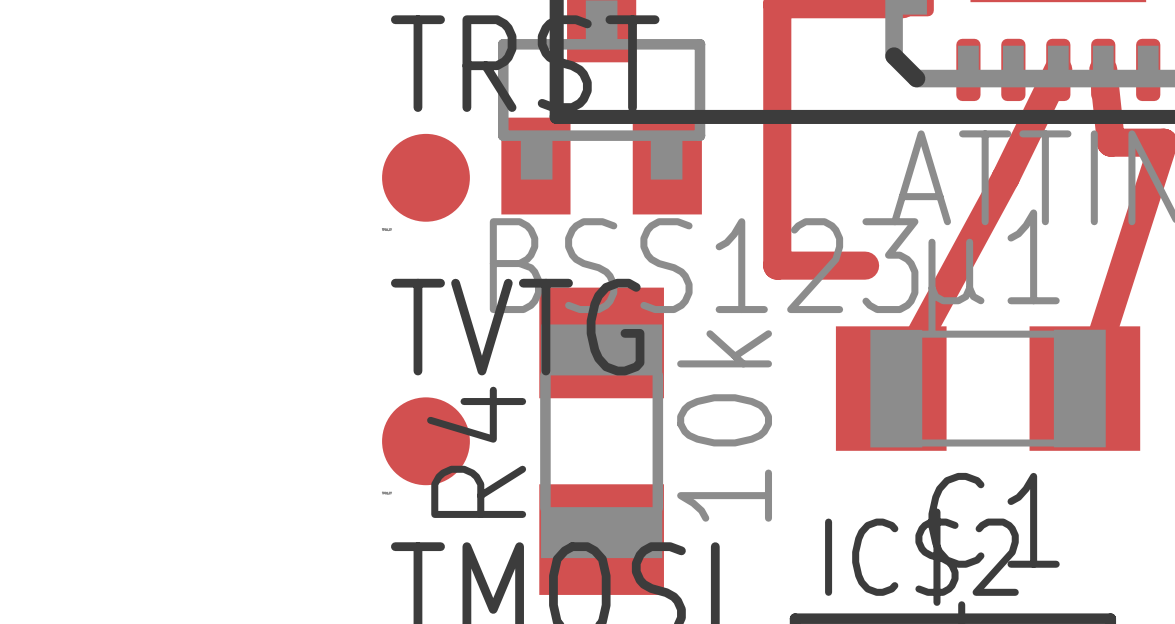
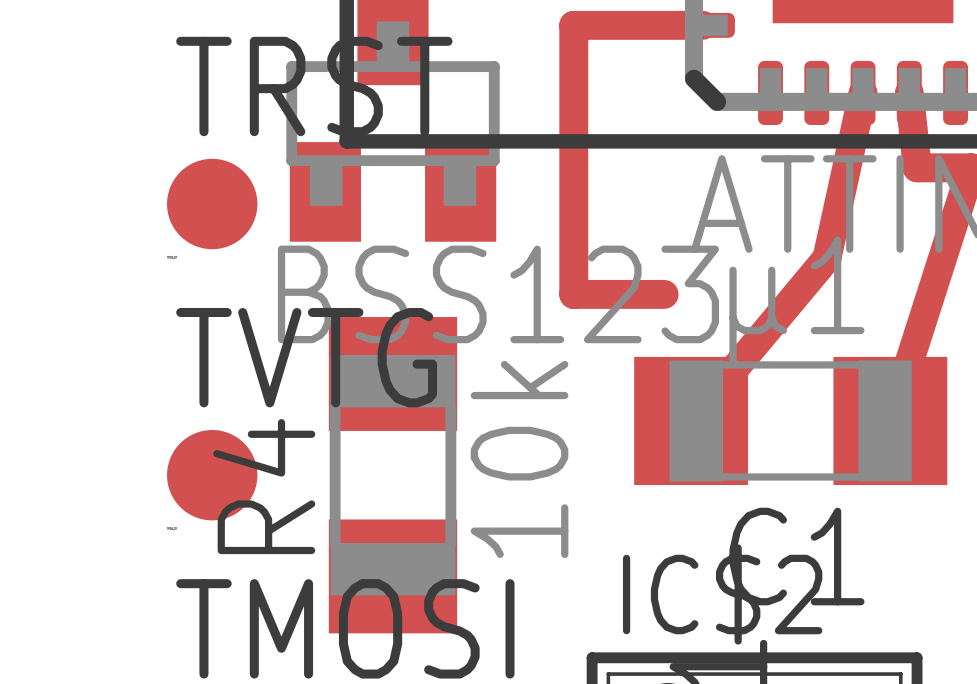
track: (1058, 69) (1005, 177) (891, 388) -> (863, 92) (826, 258) (691, 420)

